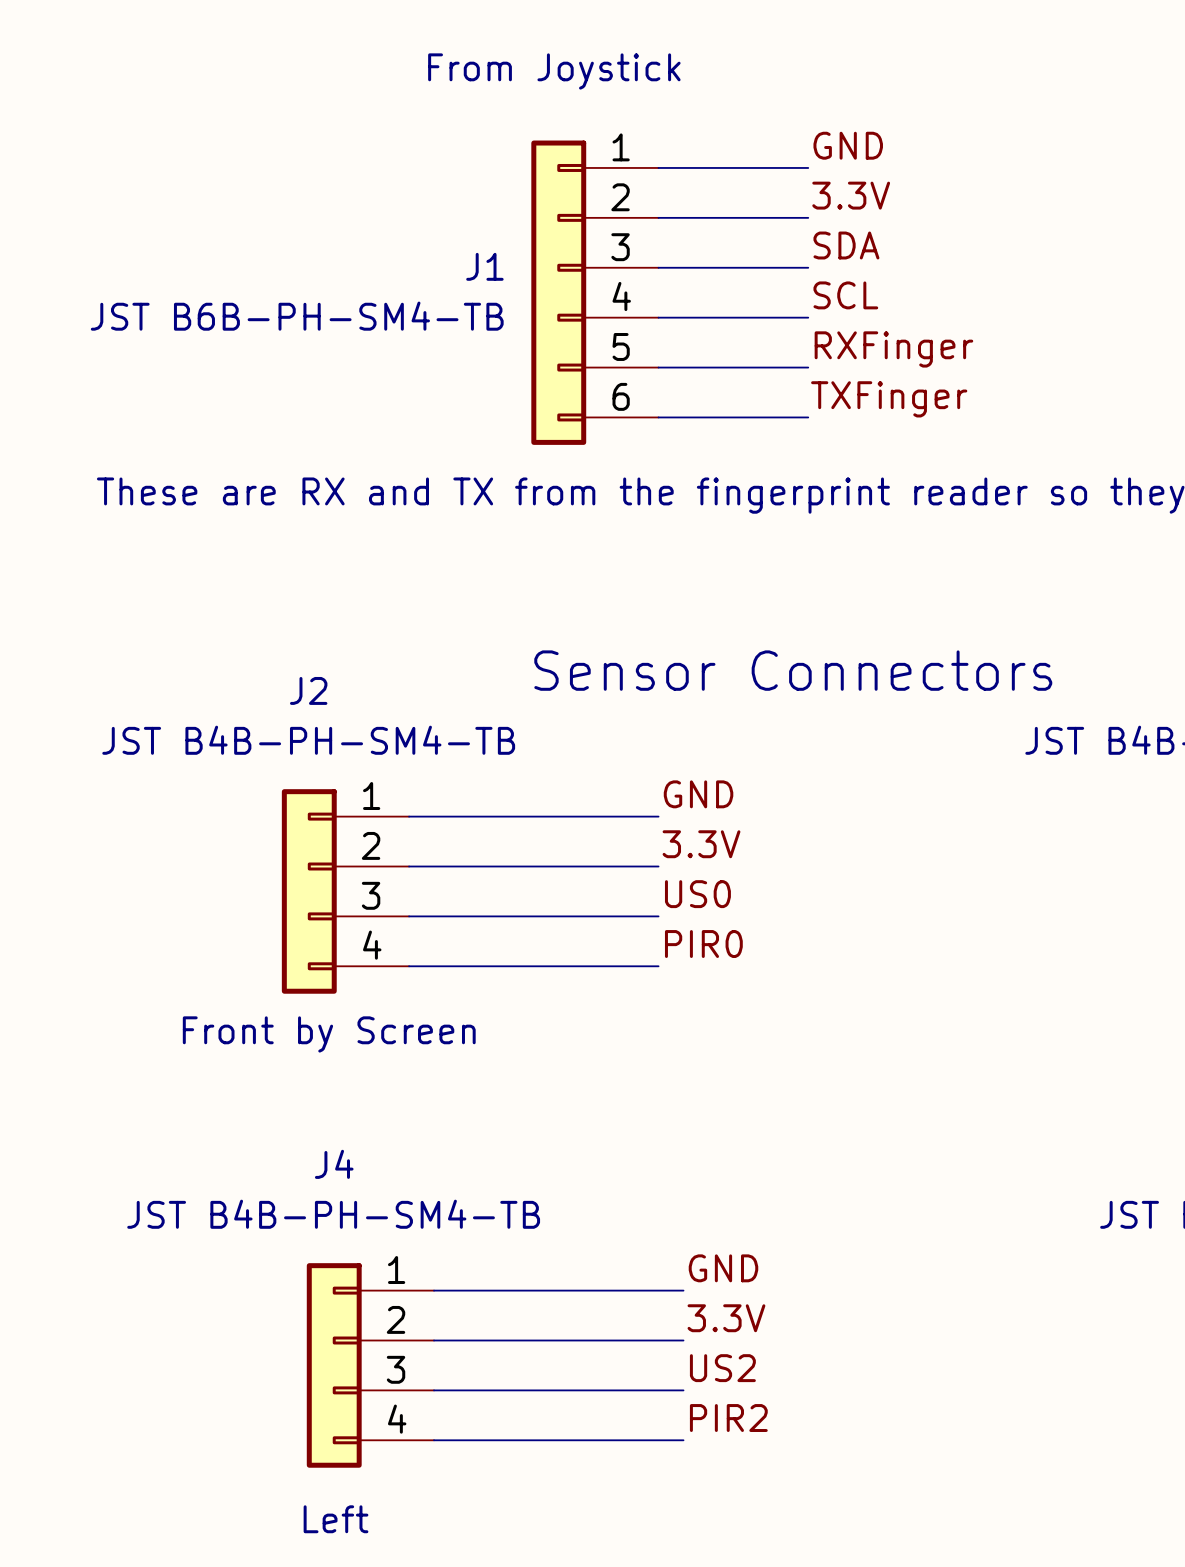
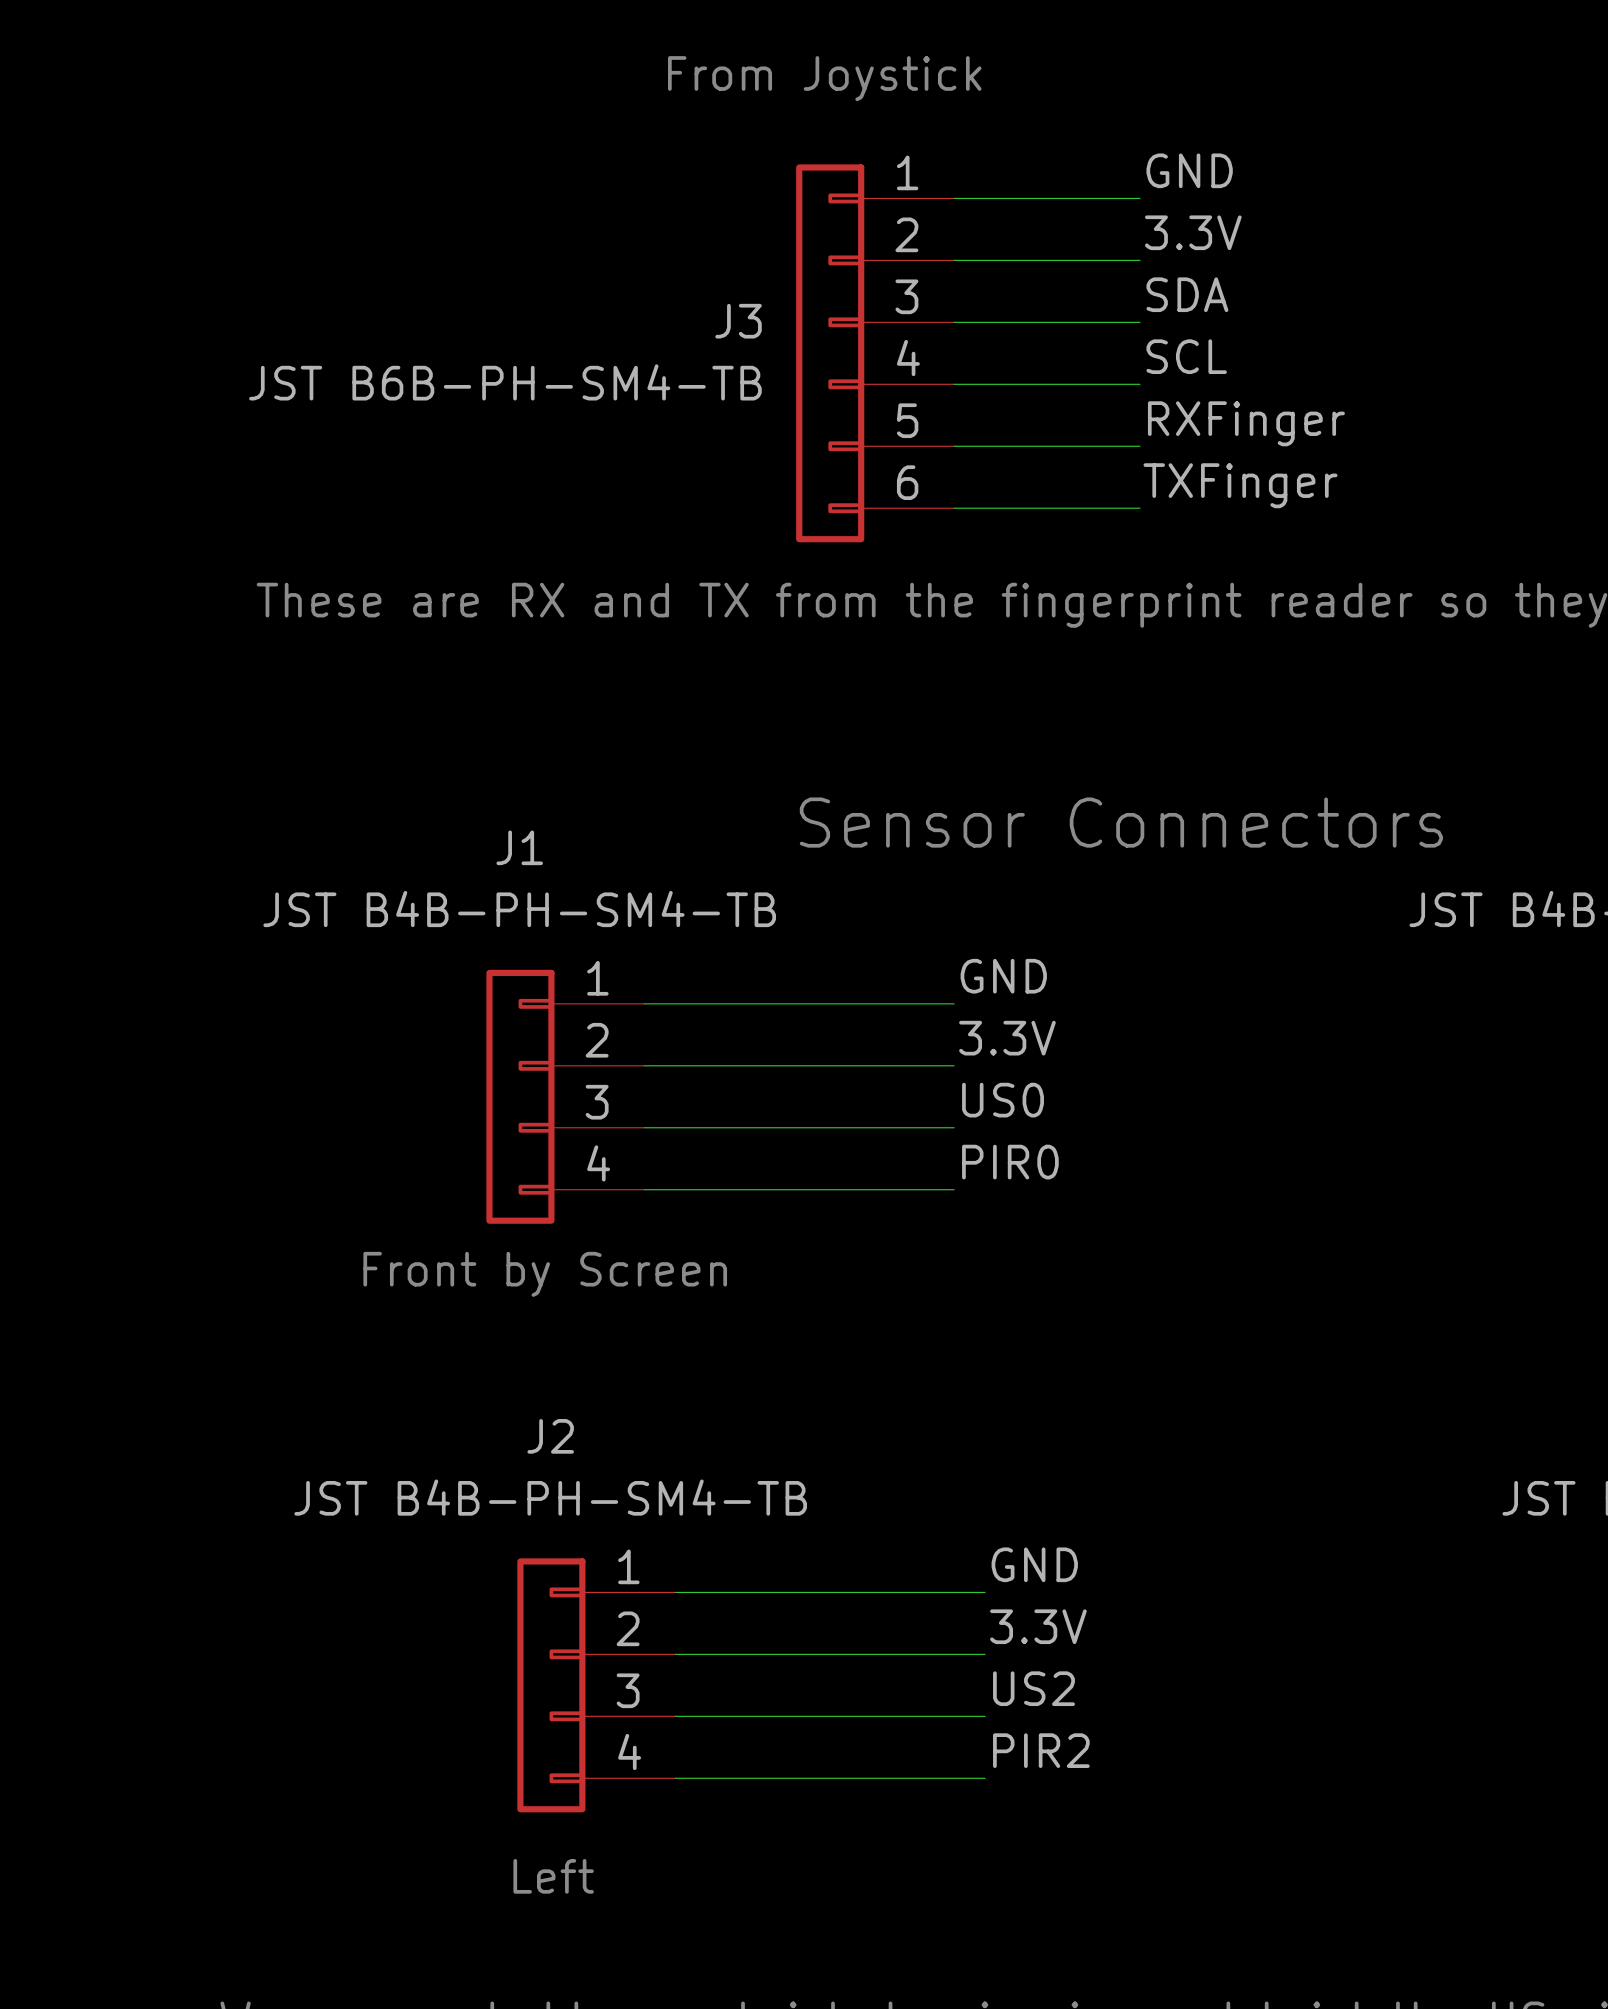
J1 name: J1 (484, 266) -> J3 (738, 321)
J2 name: J2 (308, 690) -> J1 (519, 847)
J4 name: J4 (334, 1164) -> J2 (550, 1436)

